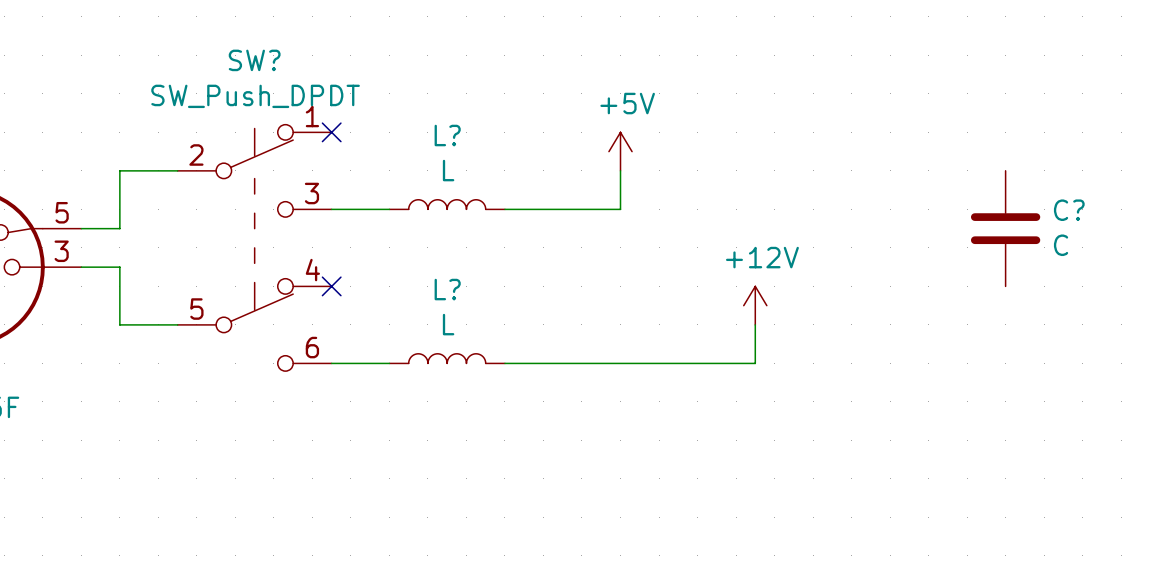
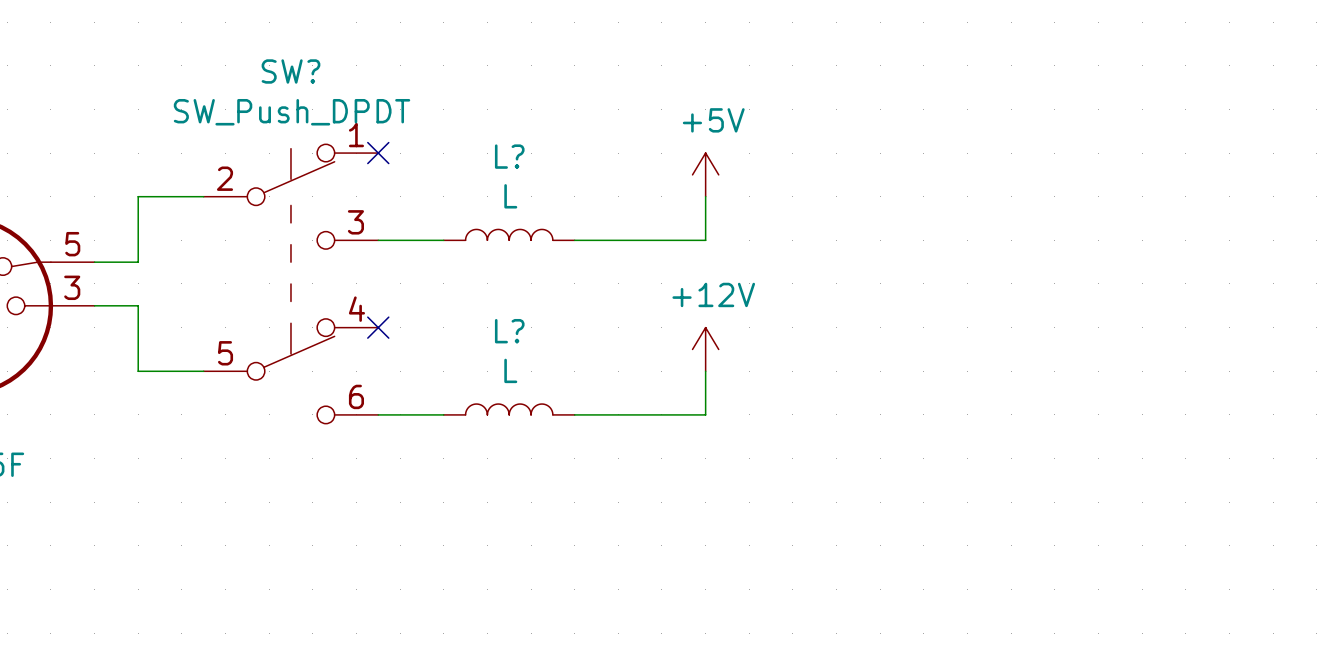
C?: C (1005, 228) -> none
power symbol position: +12V (755, 305) -> +12V (705, 349)
wire: (755, 324) (755, 363) (620, 363) -> (705, 371) (705, 414)

